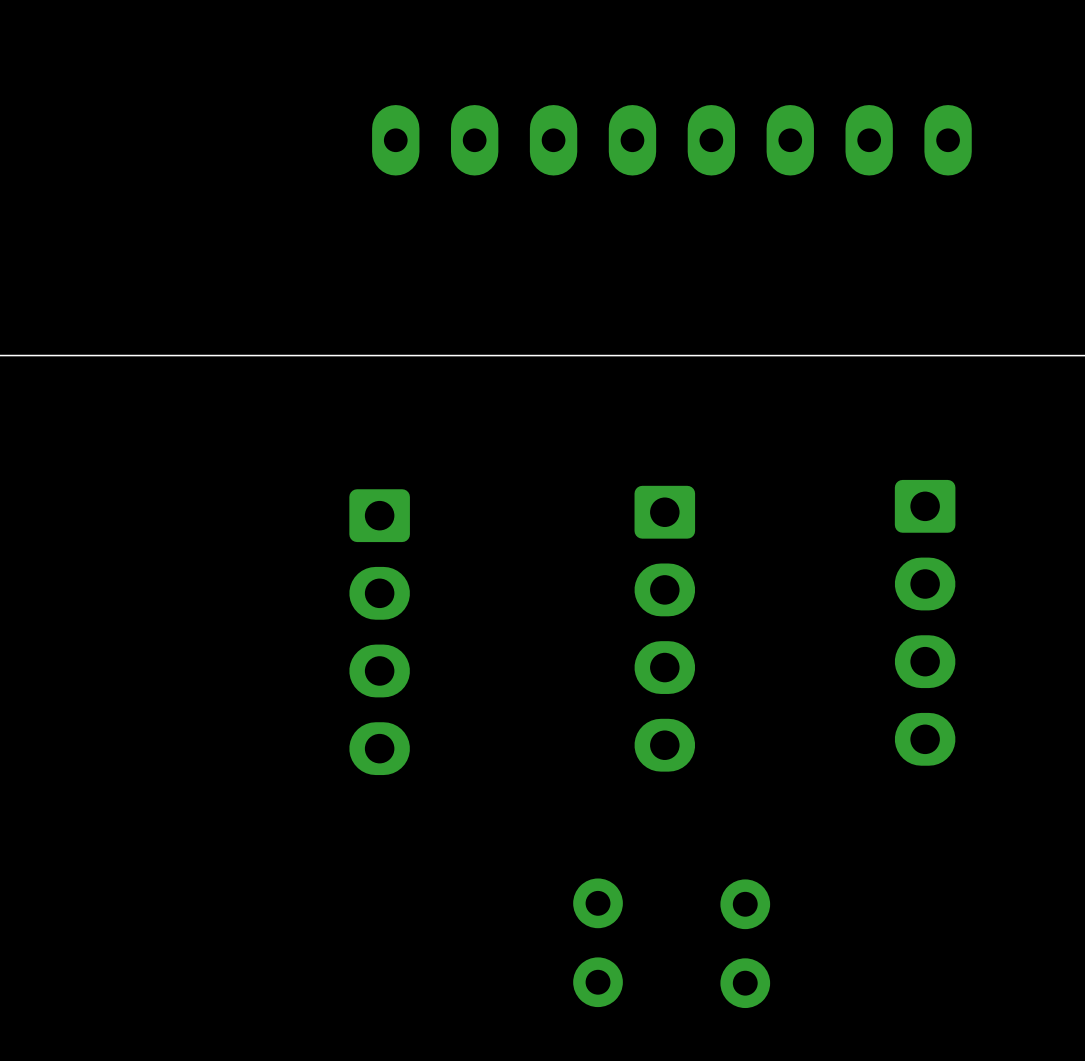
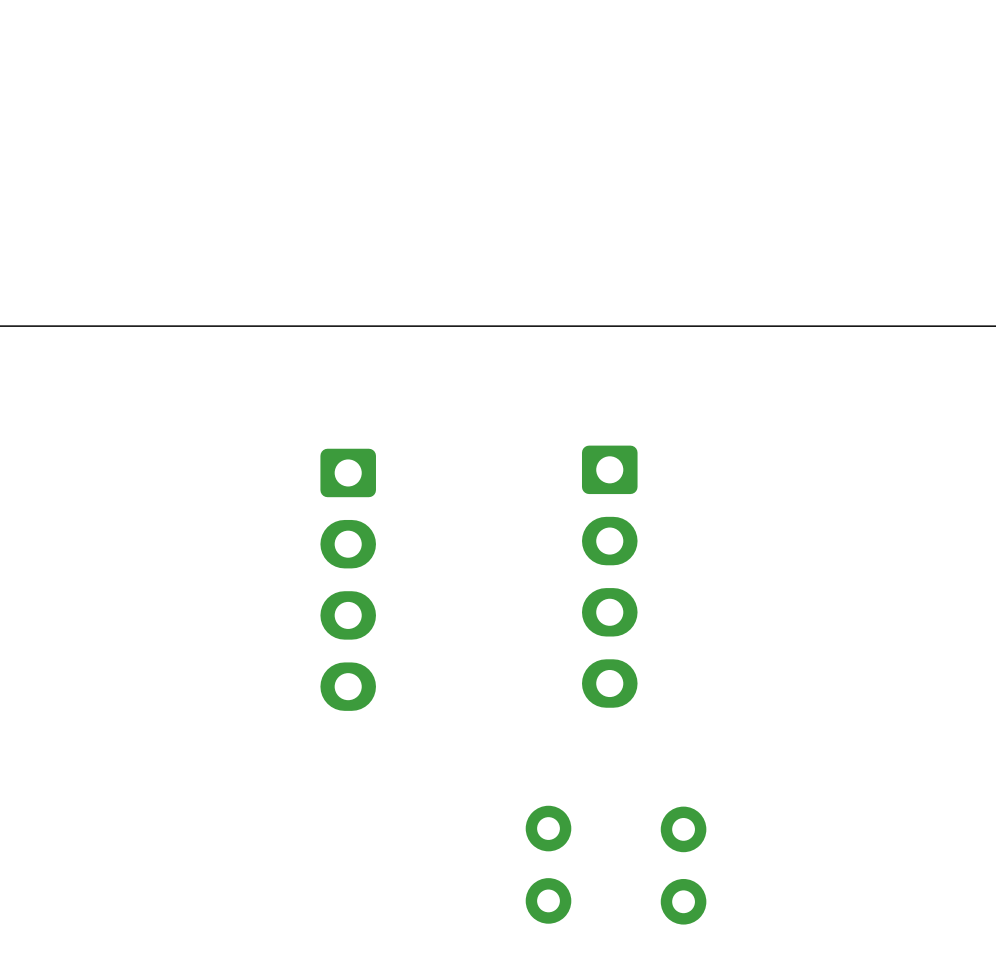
part: (671, 140) -> none
part: (925, 622) -> none

